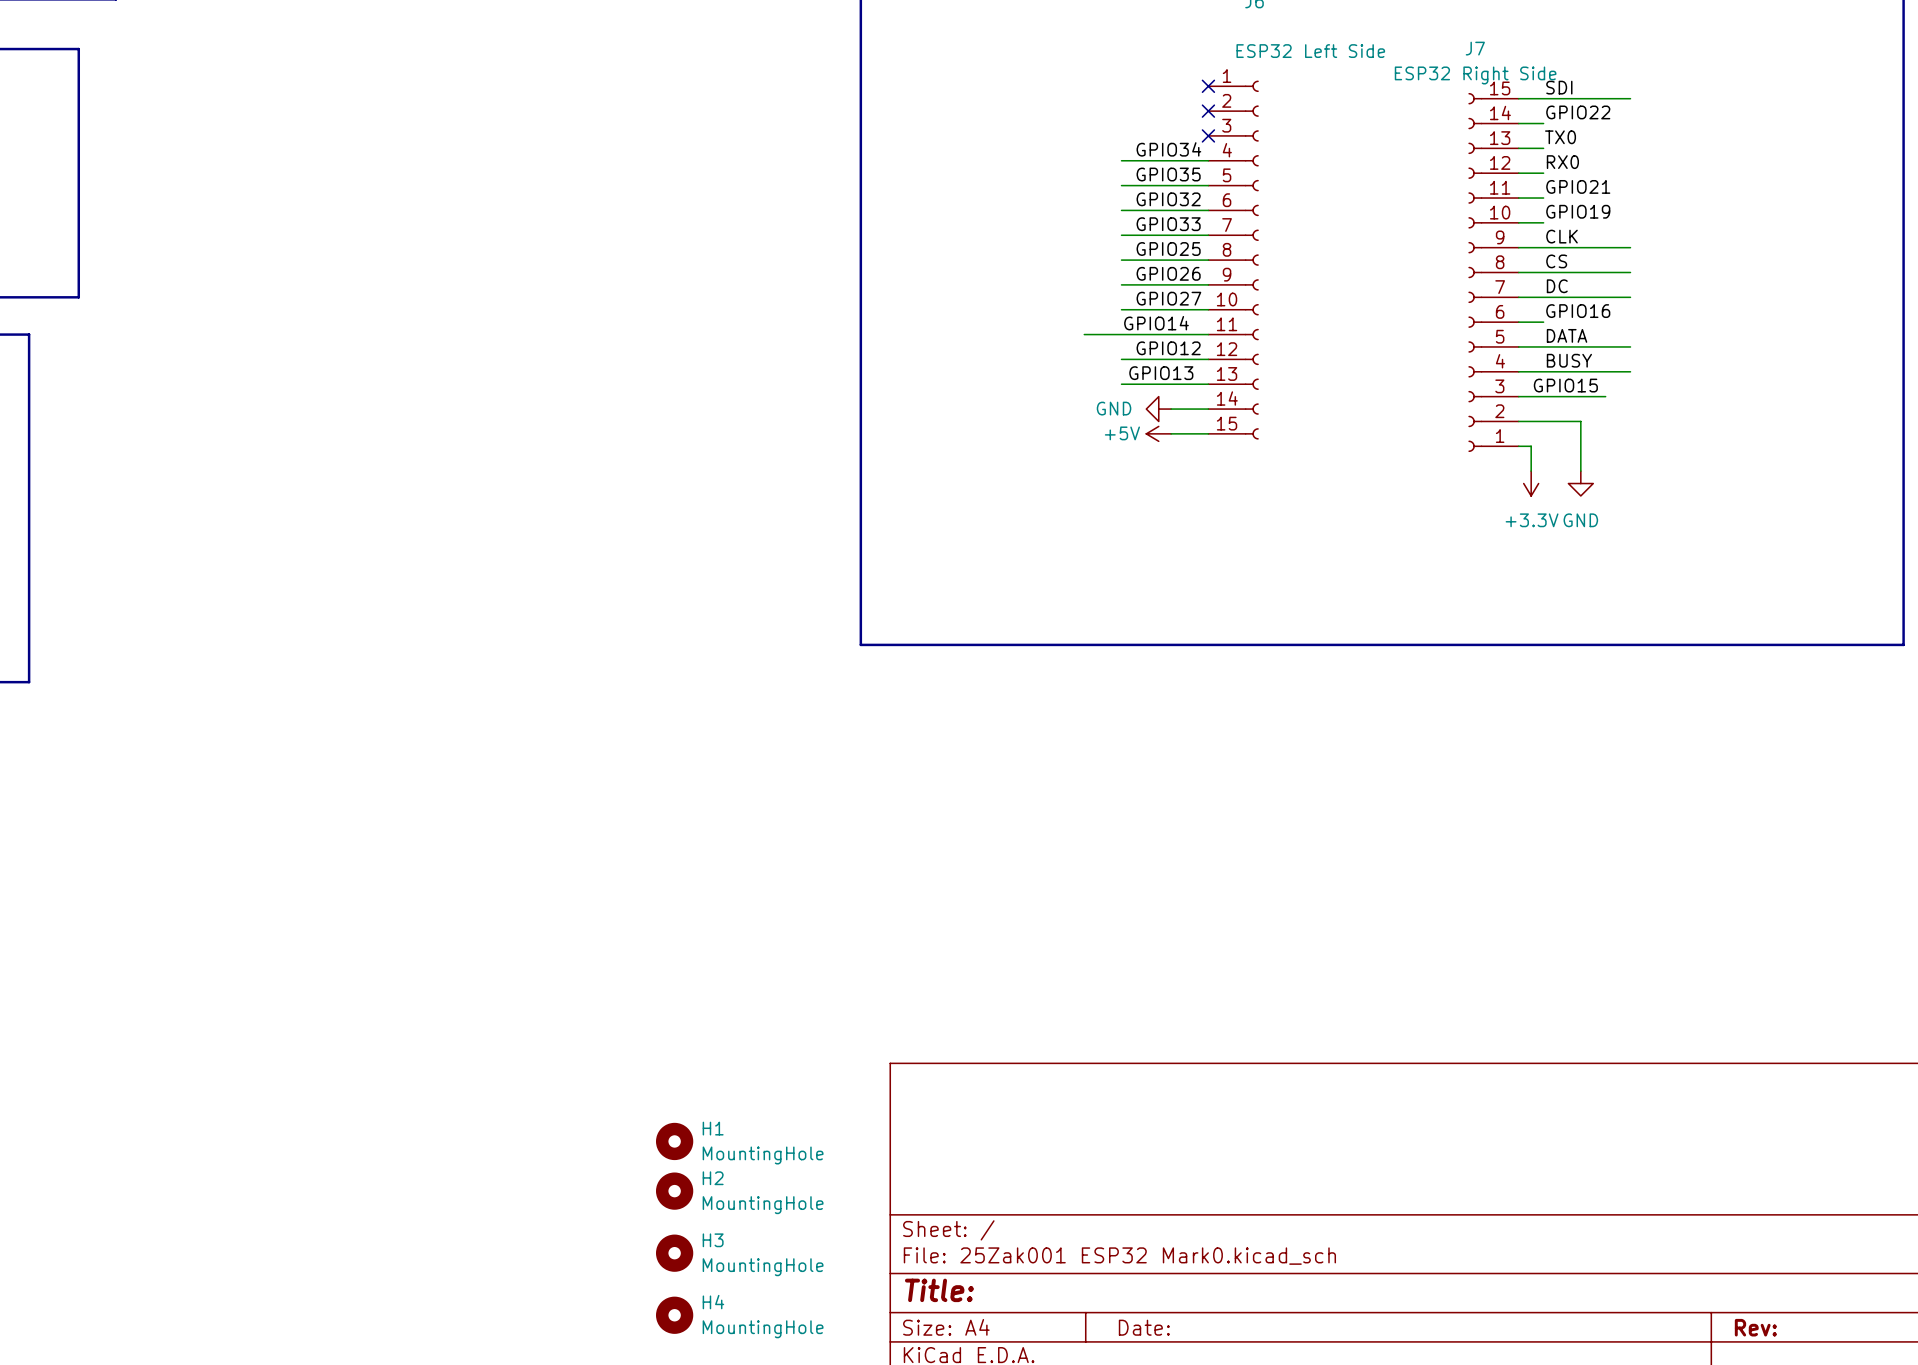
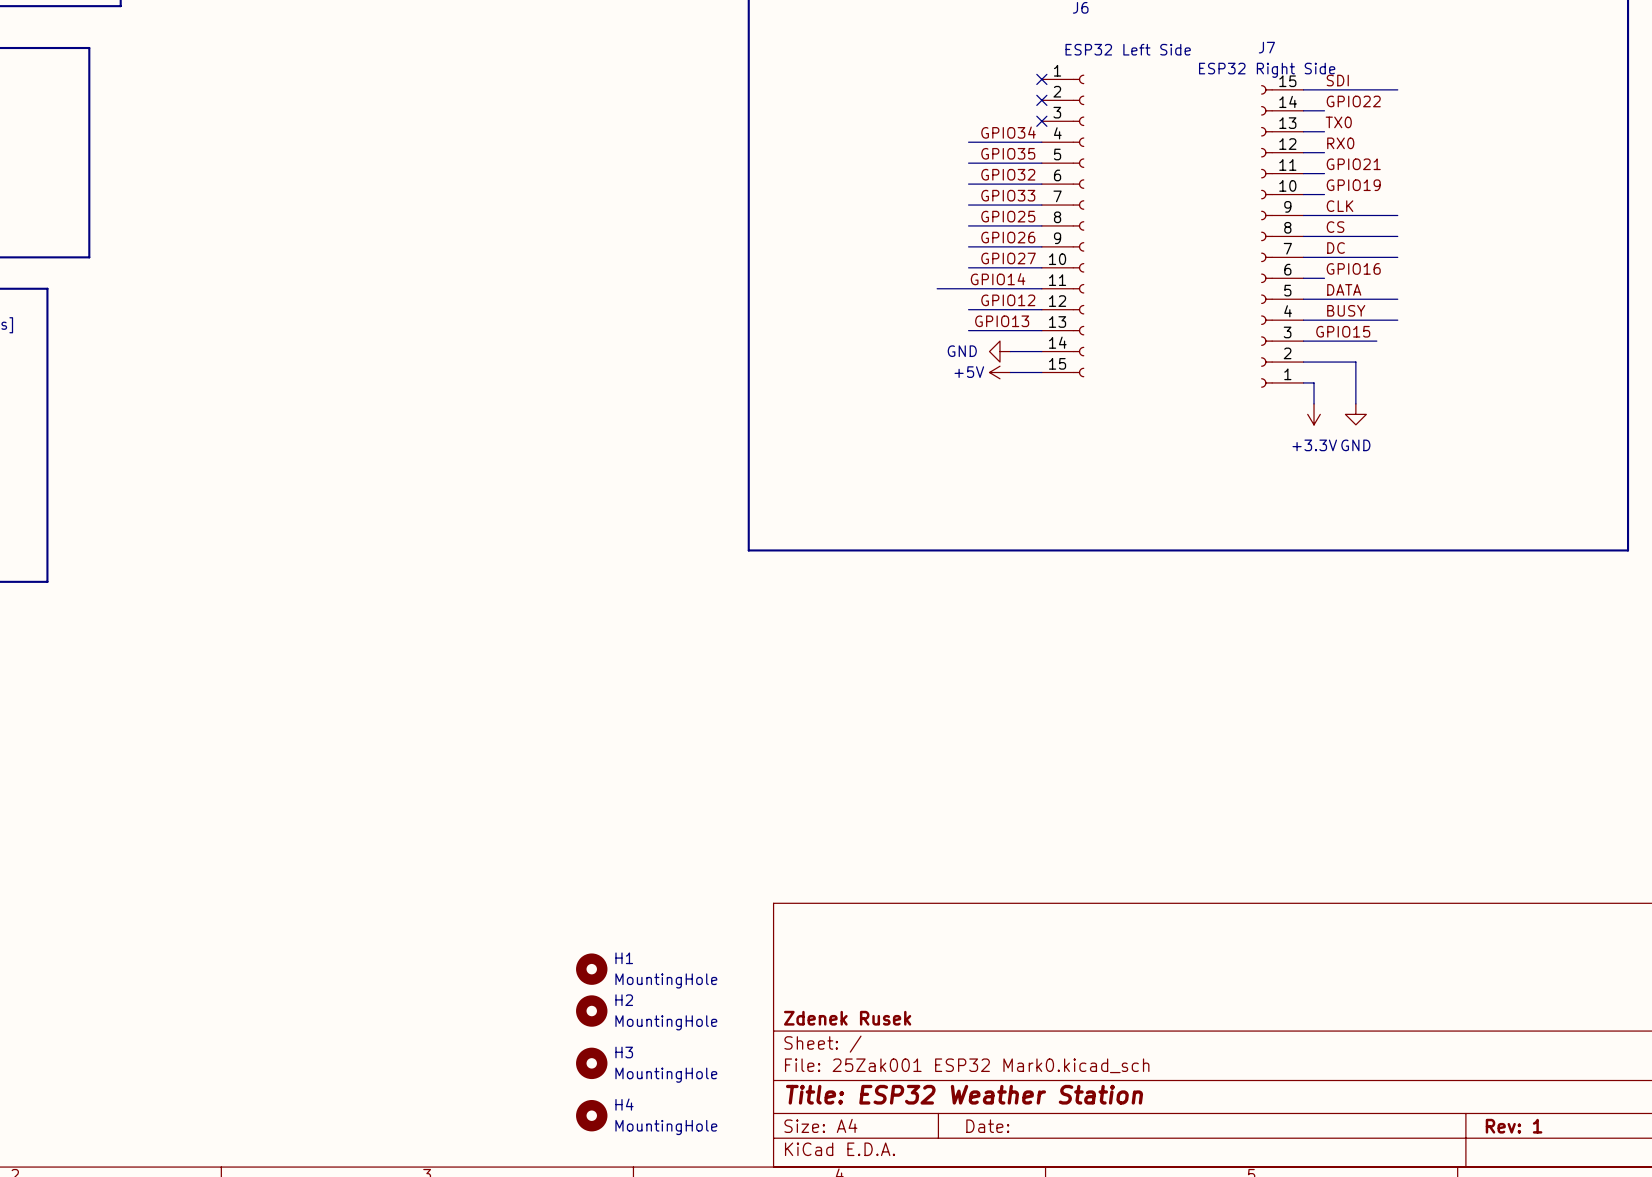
title block: none -> Zdenek Rusek (847, 1018)
title block: Title: (939, 1290) -> Title: ESP32 Weather Station (964, 1094)
title block: Rev: (1755, 1327) -> Rev: 1 (1514, 1126)

